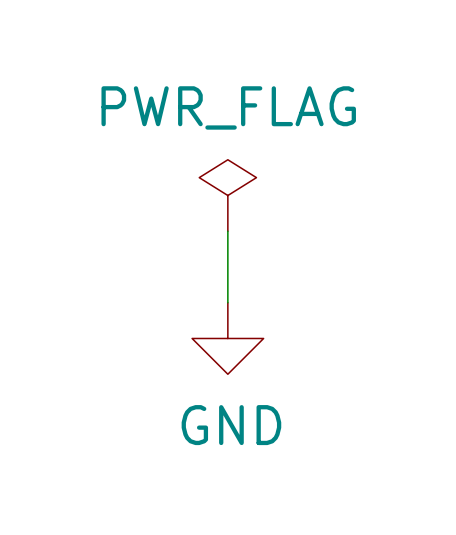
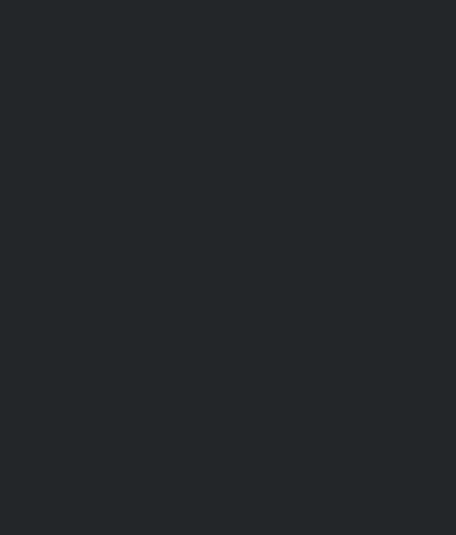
power symbol: PWR_FLAG (227, 195) -> none
wire: (227, 231) (227, 302) -> none
power symbol: GND (227, 338) -> none

